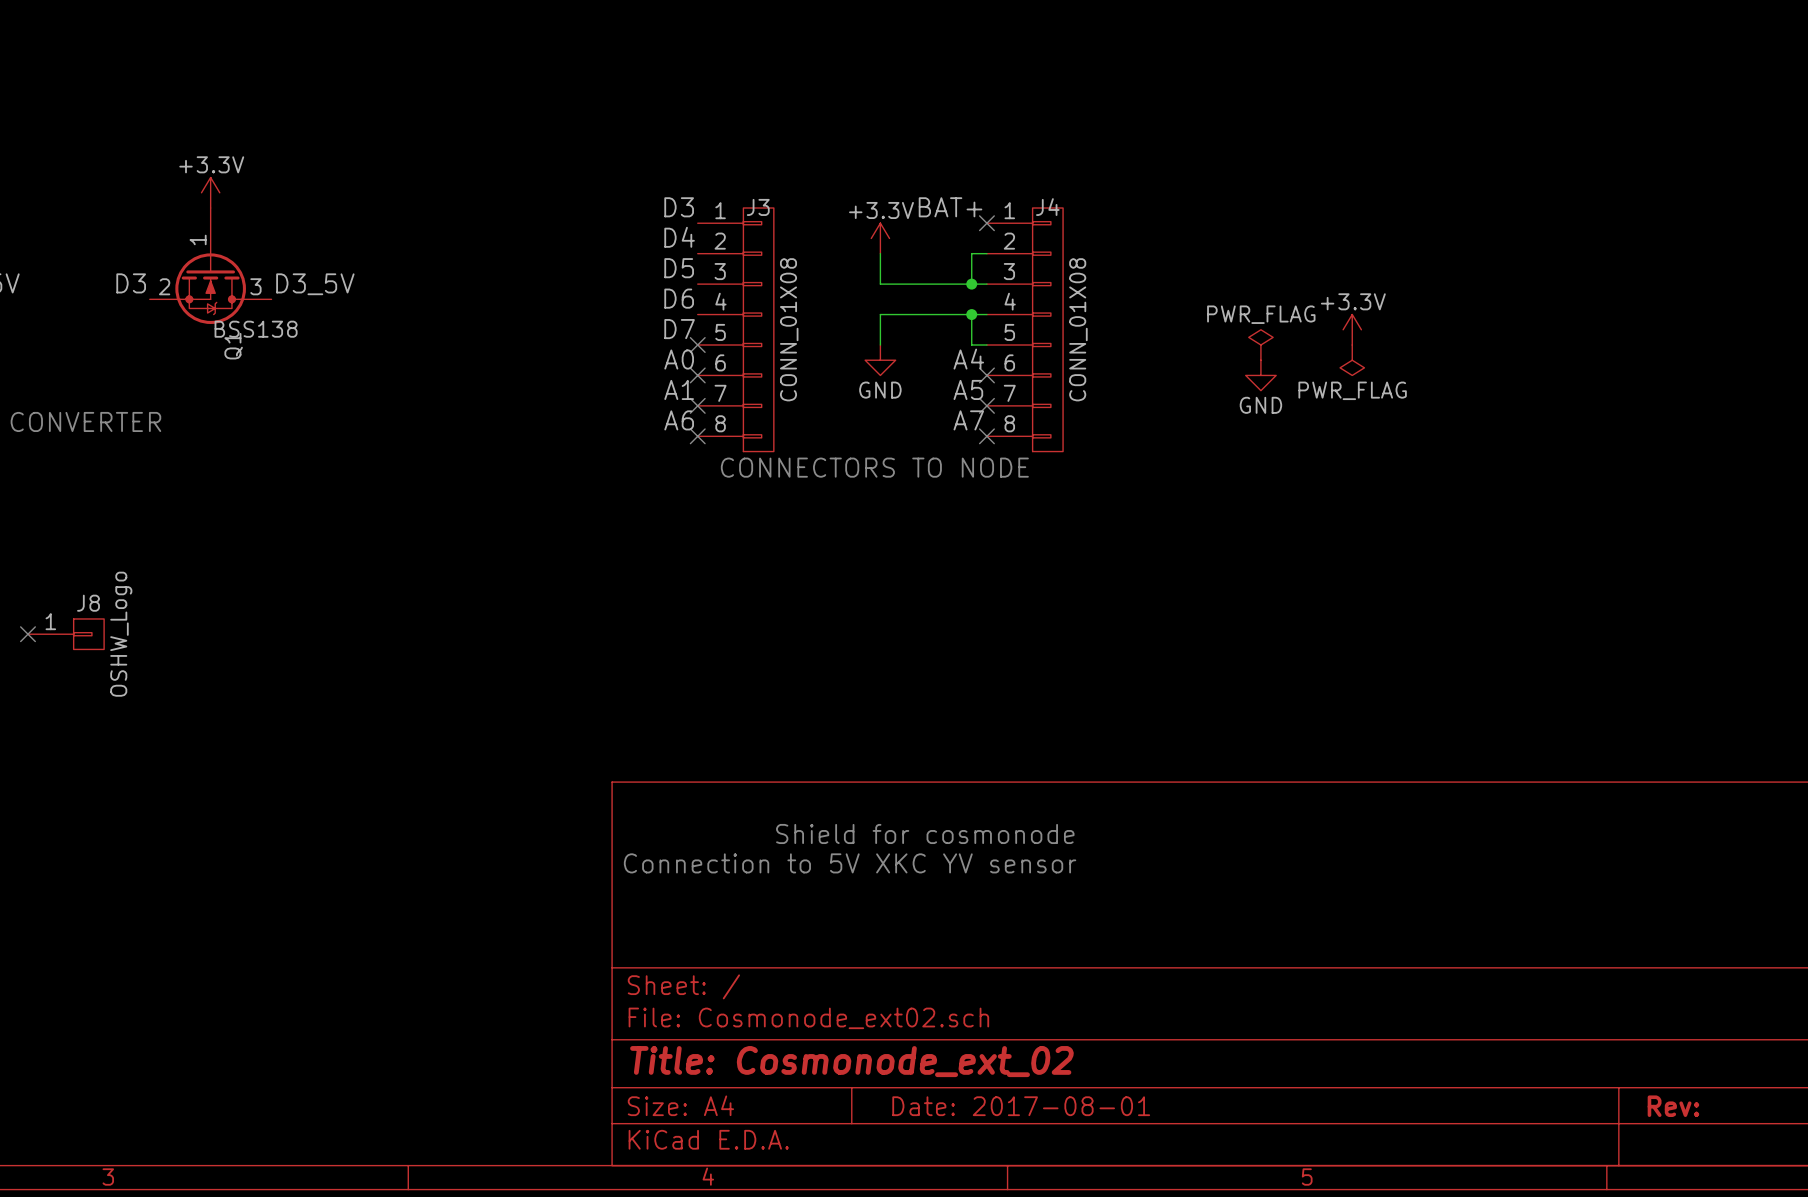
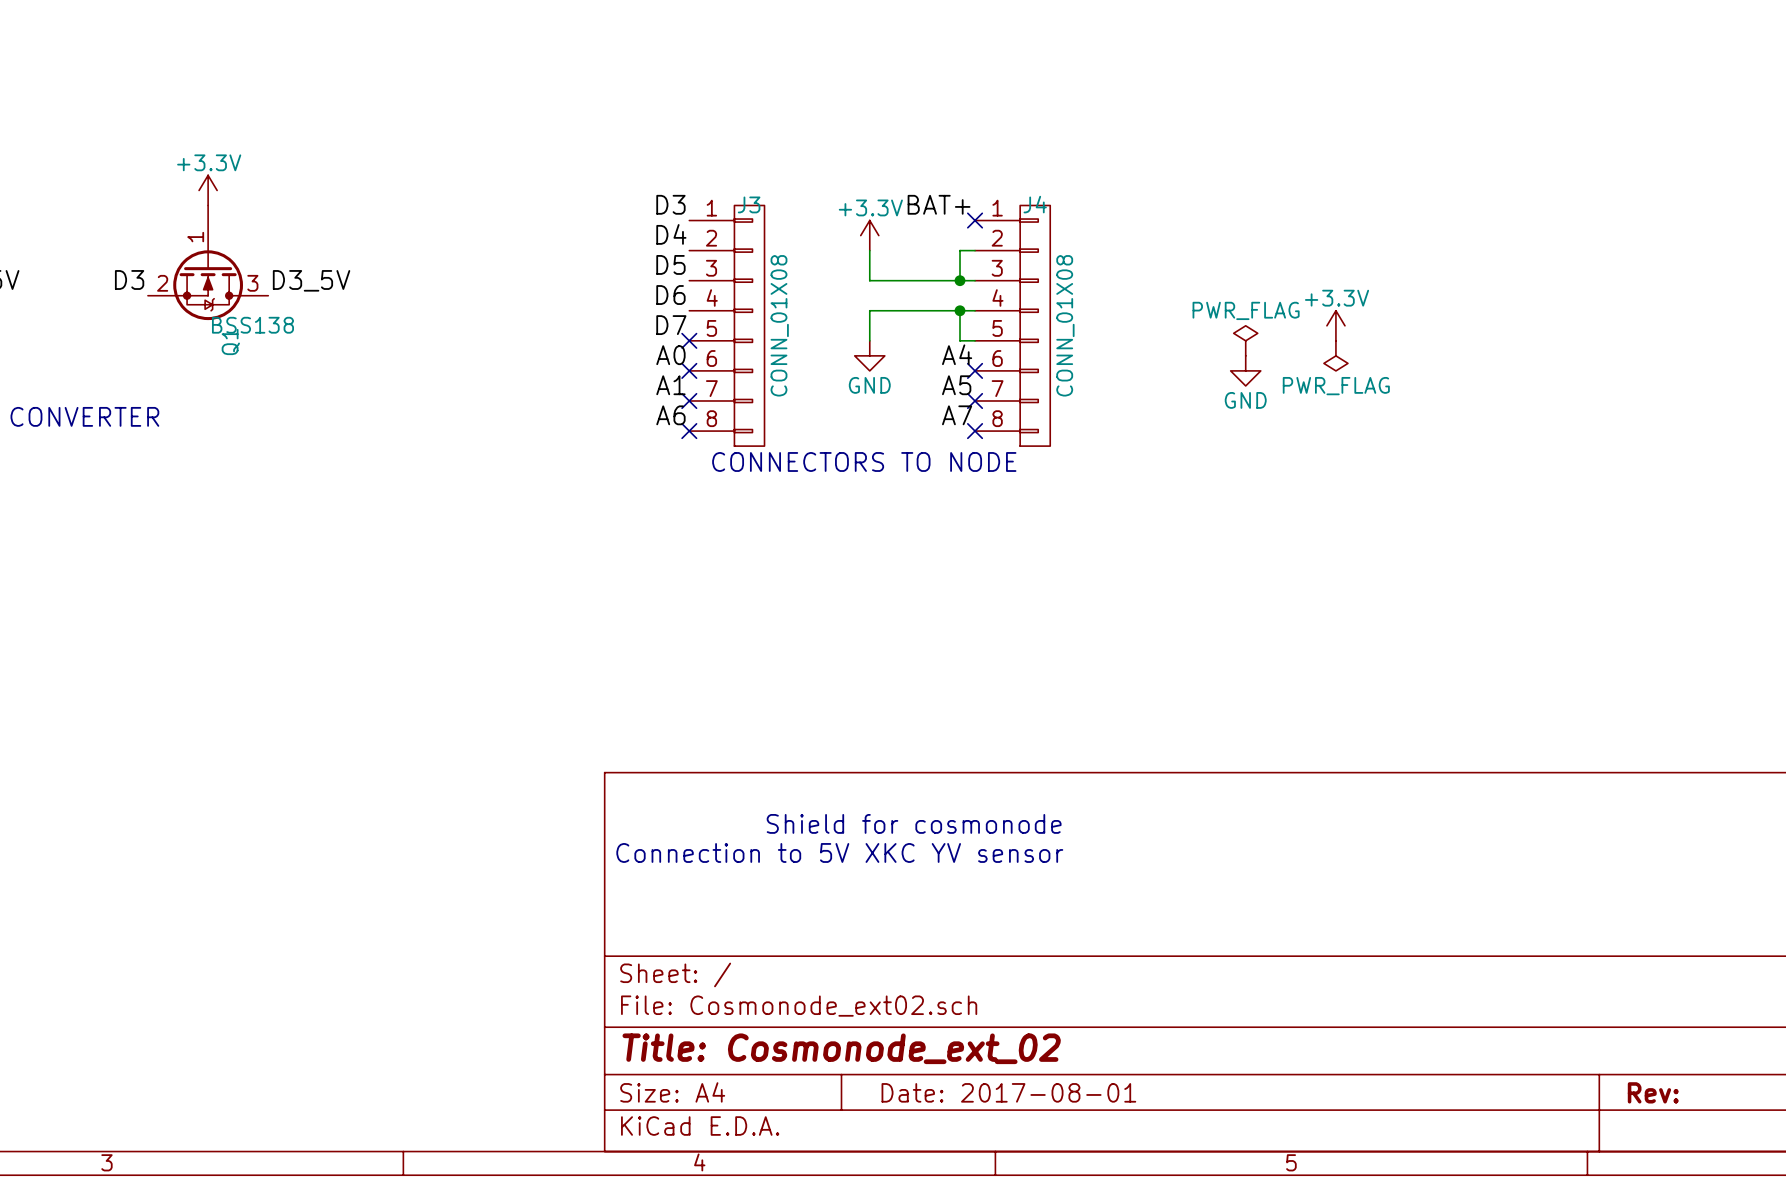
no-connect mark: (27, 634) -> none
J8: OSHW_Logo (66, 634) -> none

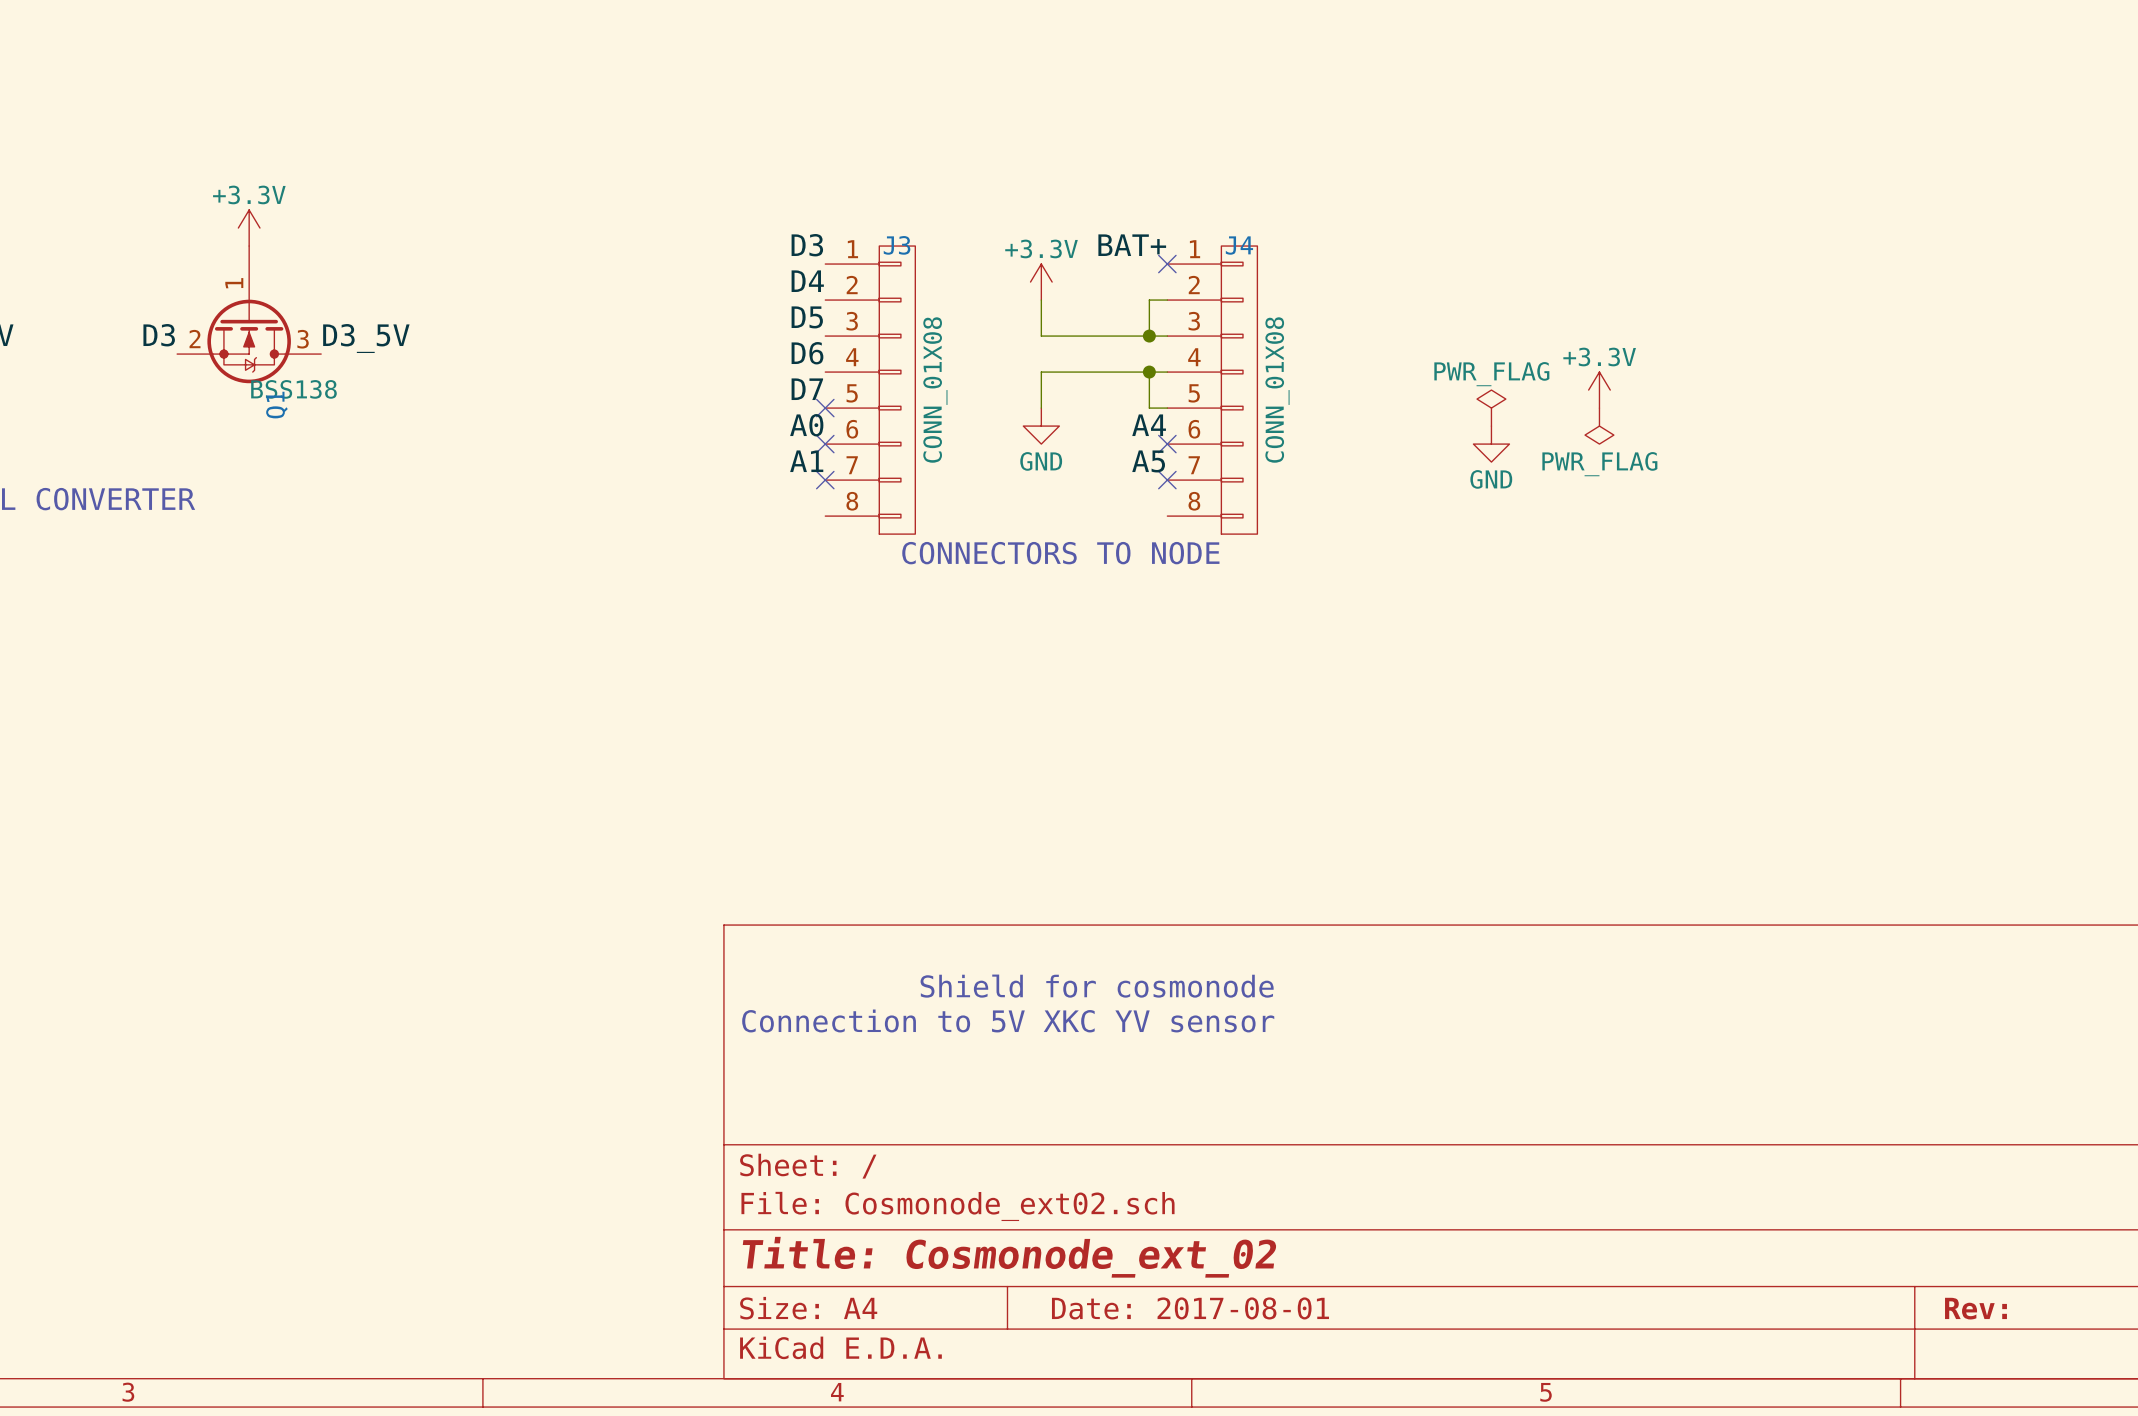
label: A6 (670, 415) -> none
label: A7 (957, 415) -> none
no-connect mark: (689, 431) -> none
no-connect mark: (975, 431) -> none

